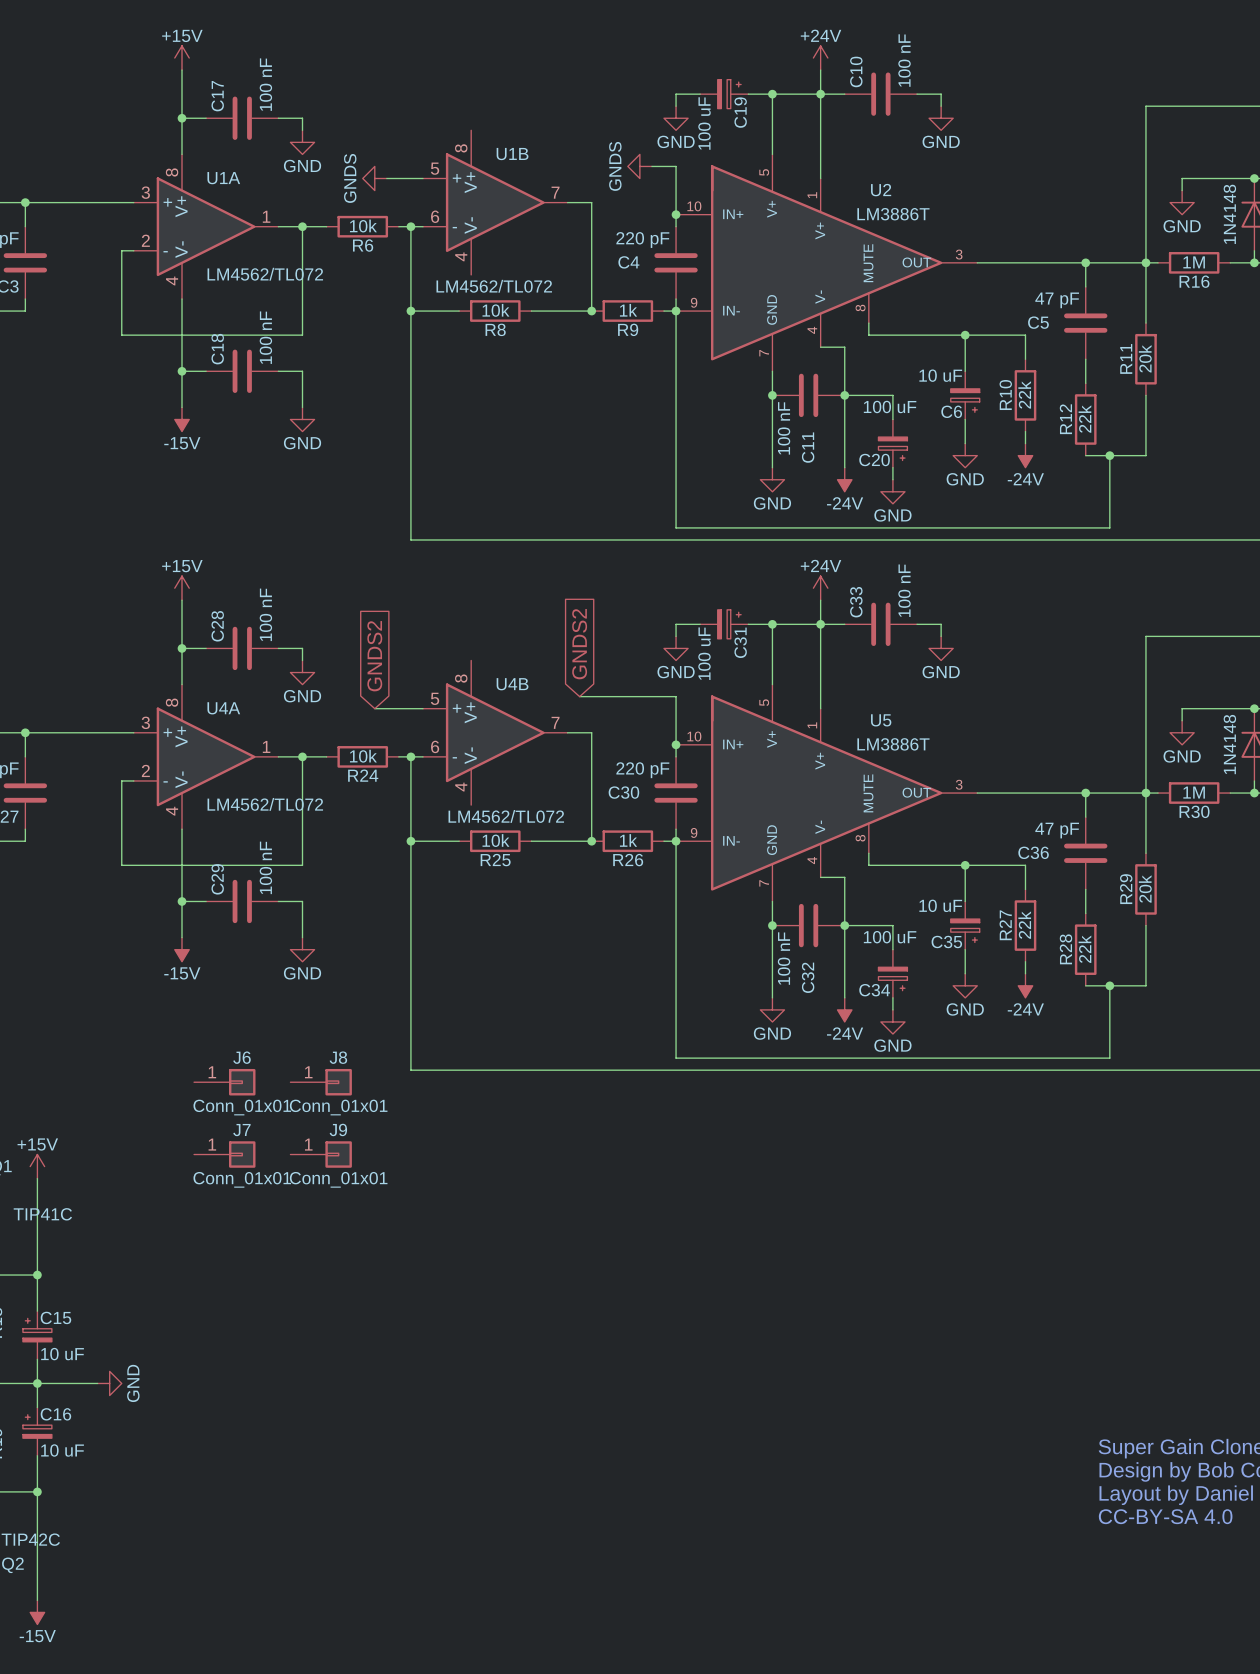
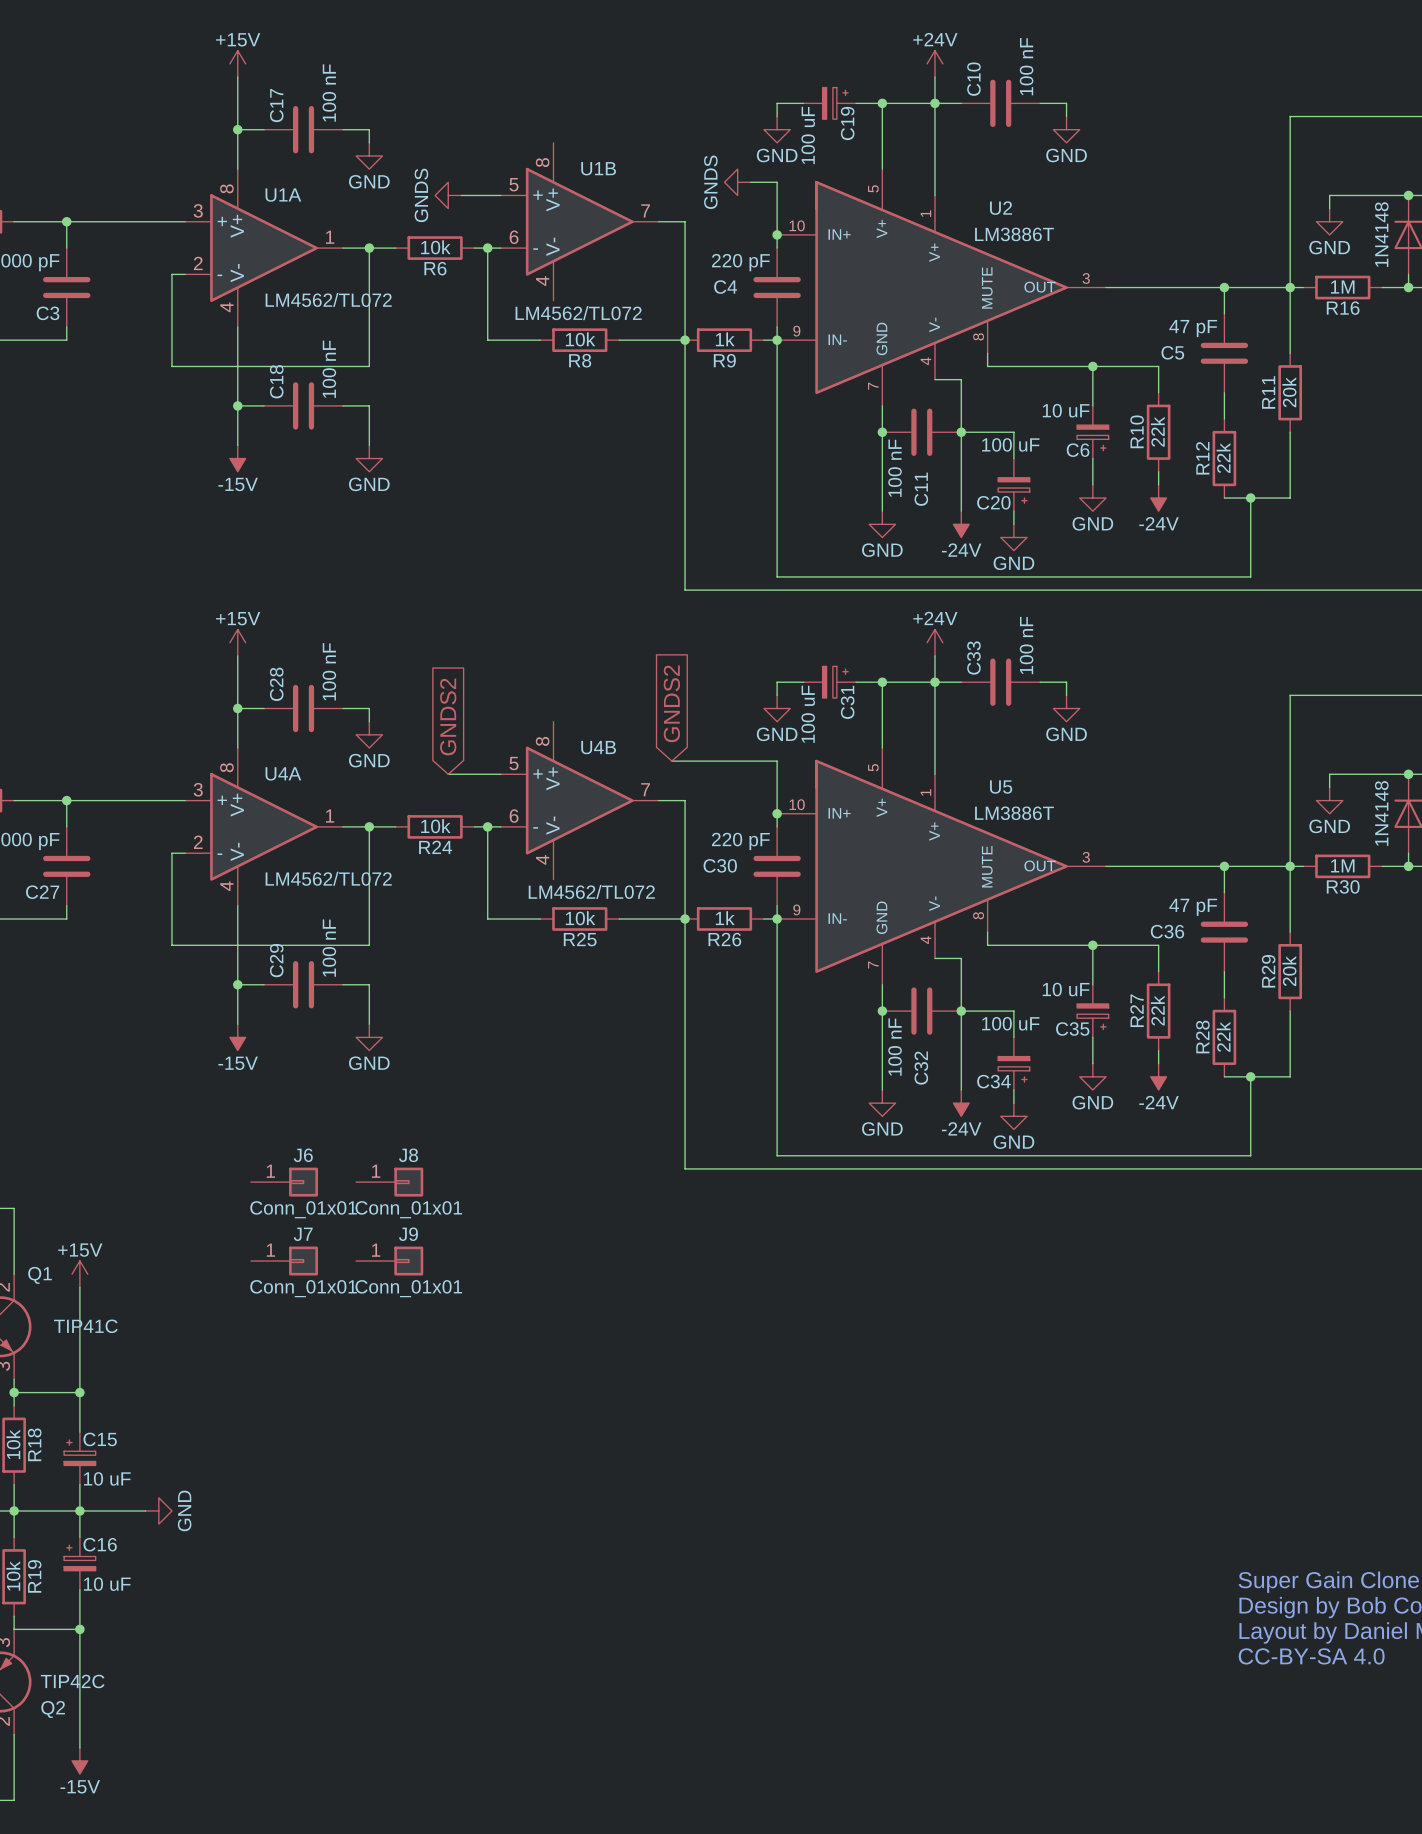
wire: (410, 311) (410, 539) (591, 539) -> (685, 340) (685, 590)
junction: (410, 311) -> none
wire: (410, 841) (410, 1070) (591, 1070) -> (685, 918) (685, 1168)
junction: (410, 841) -> none

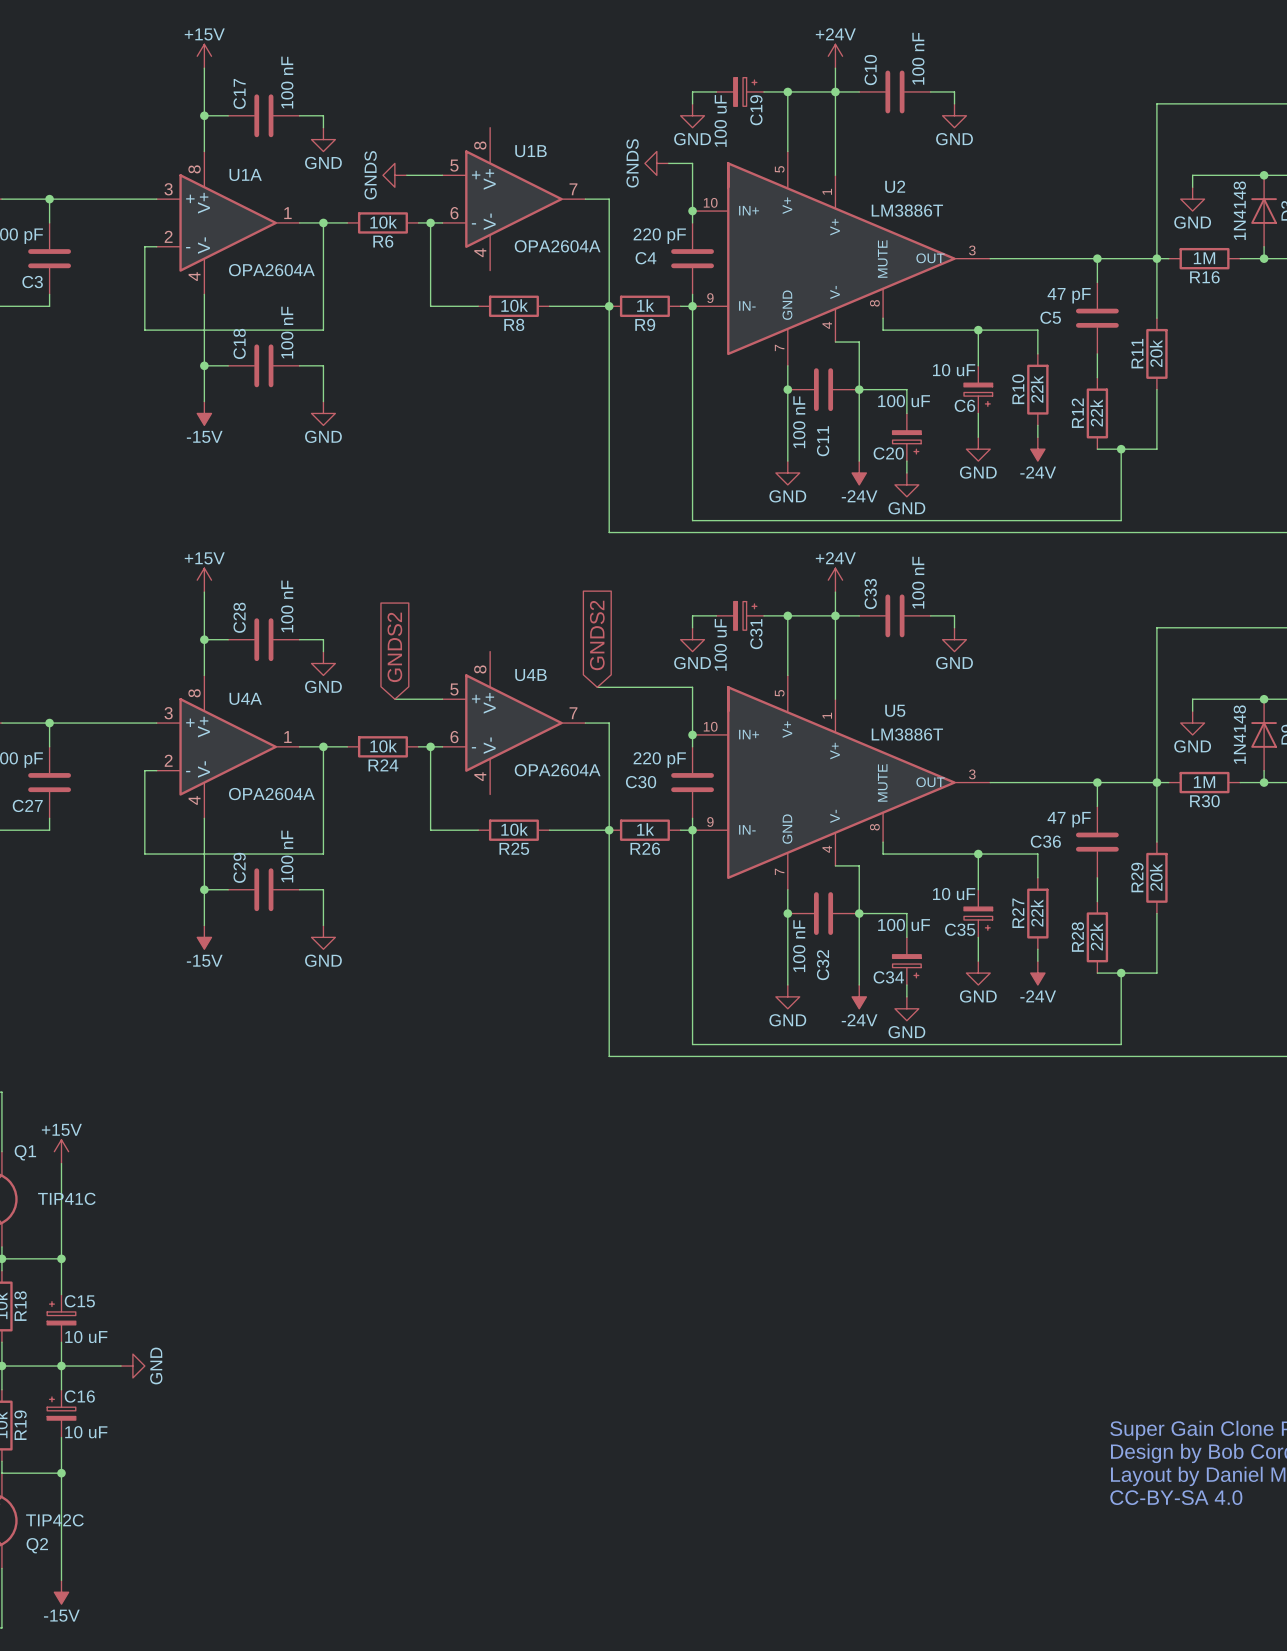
U1A value: LM4562/TL072 (328, 299) -> OPA2604A (271, 270)
U1B value: LM4562/TL072 (578, 313) -> OPA2604A (557, 246)
U4A value: LM4562/TL072 (328, 878) -> OPA2604A (271, 794)
U4B value: LM4562/TL072 (591, 891) -> OPA2604A (557, 770)
J6: Conn_01x01 (284, 1182) -> none
J8: Conn_01x01 (389, 1182) -> none
J7: Conn_01x01 (284, 1261) -> none
J9: Conn_01x01 (389, 1261) -> none

